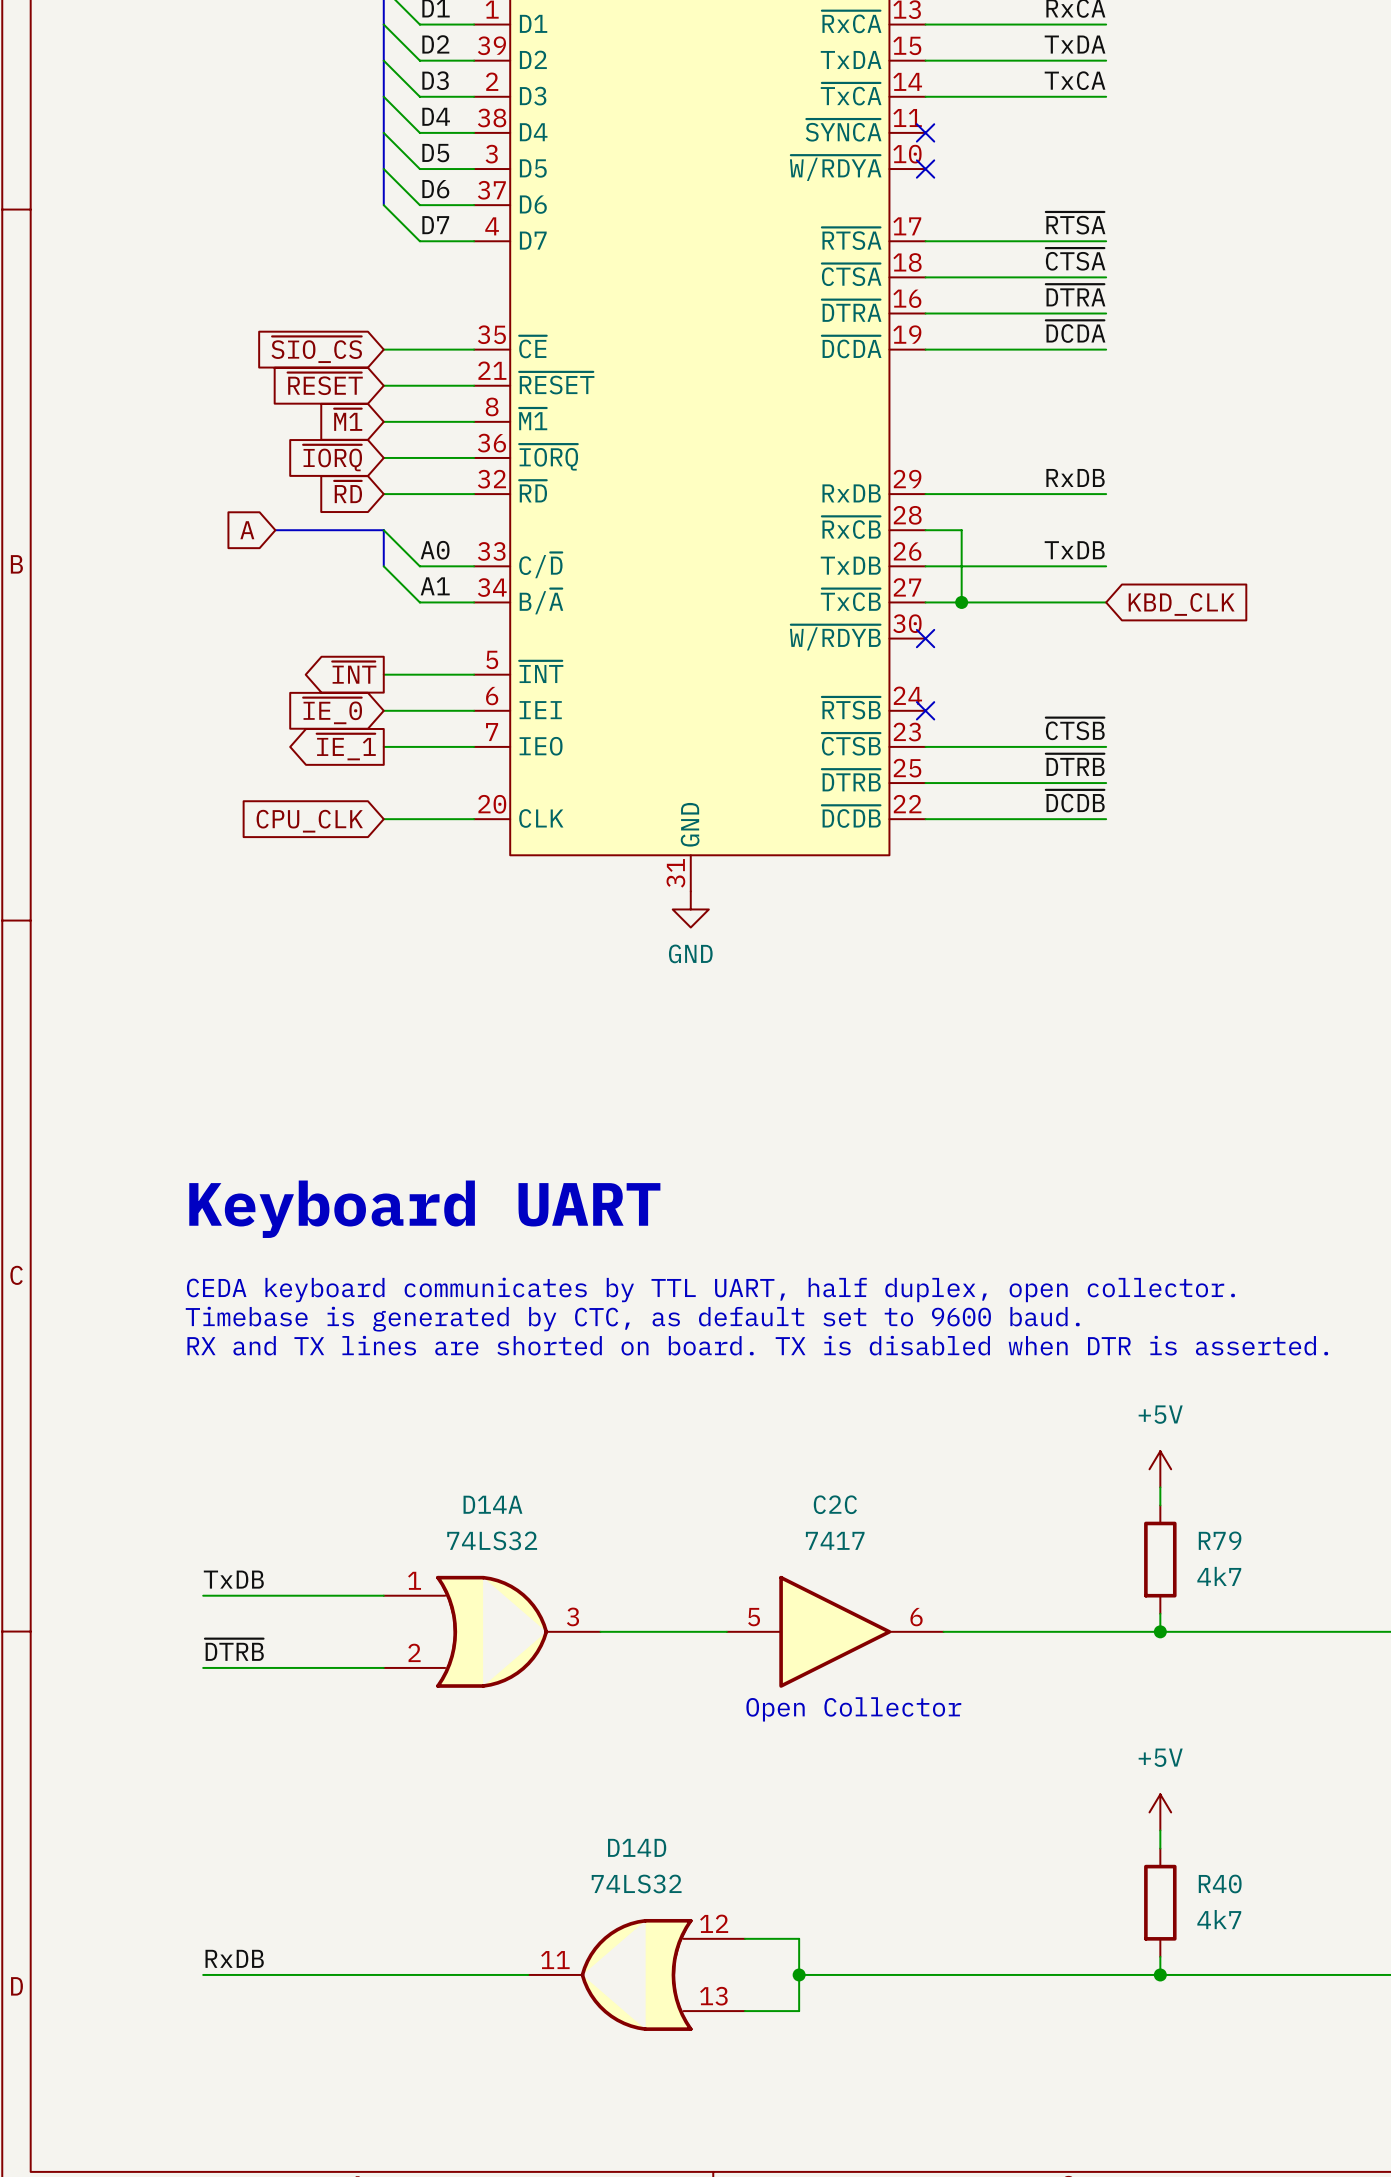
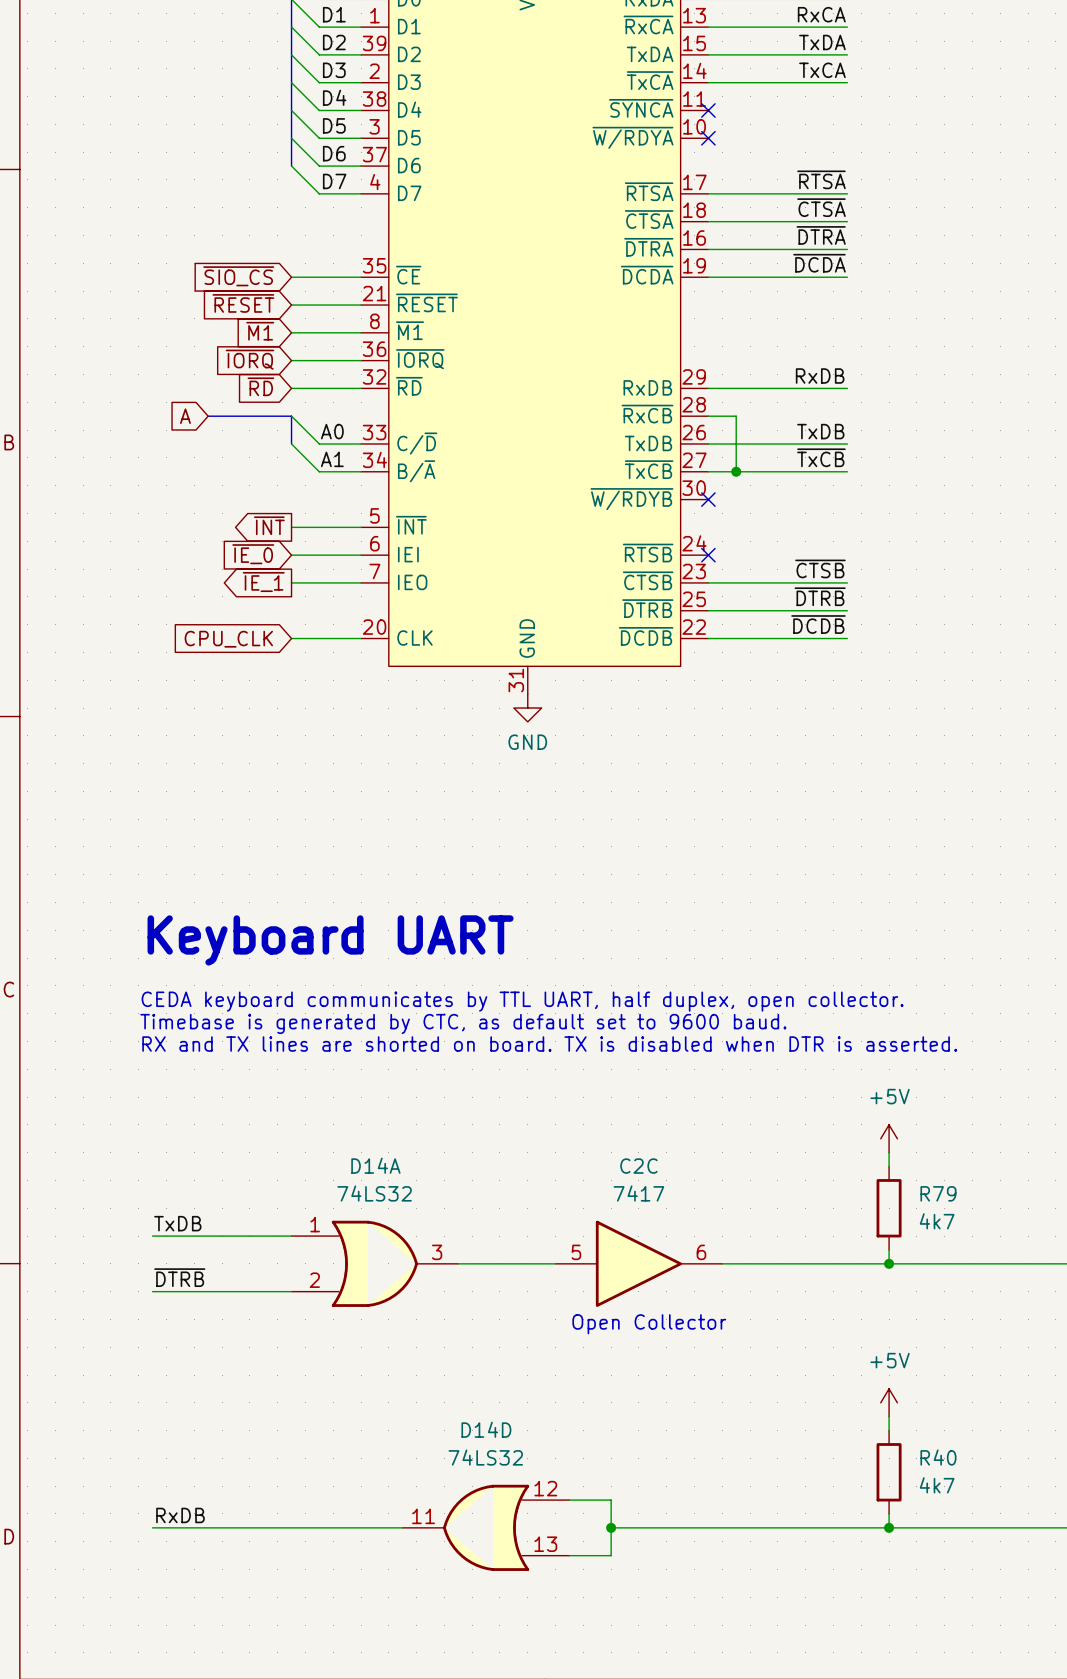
label: none -> ~{TxCB} (821, 457)
global label: KBD_CLK (1181, 604) -> none

